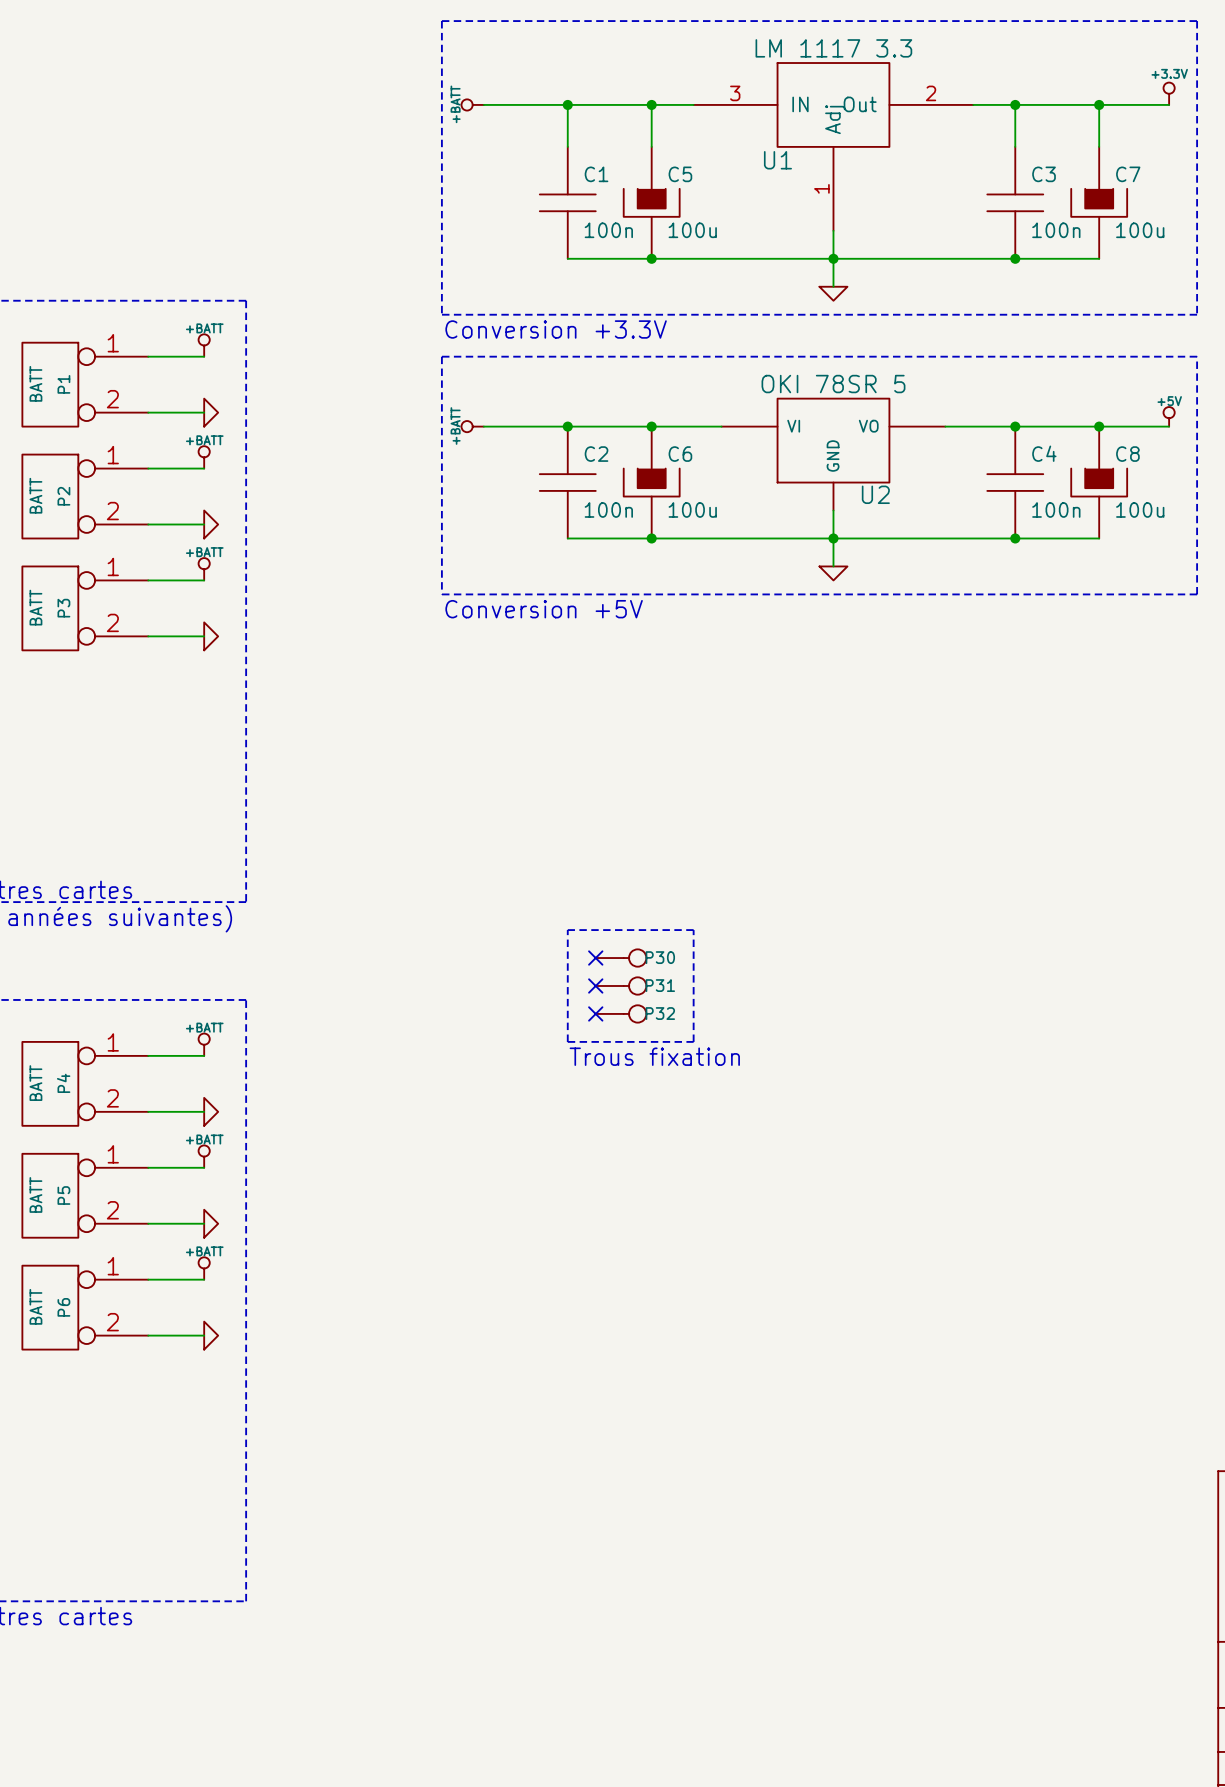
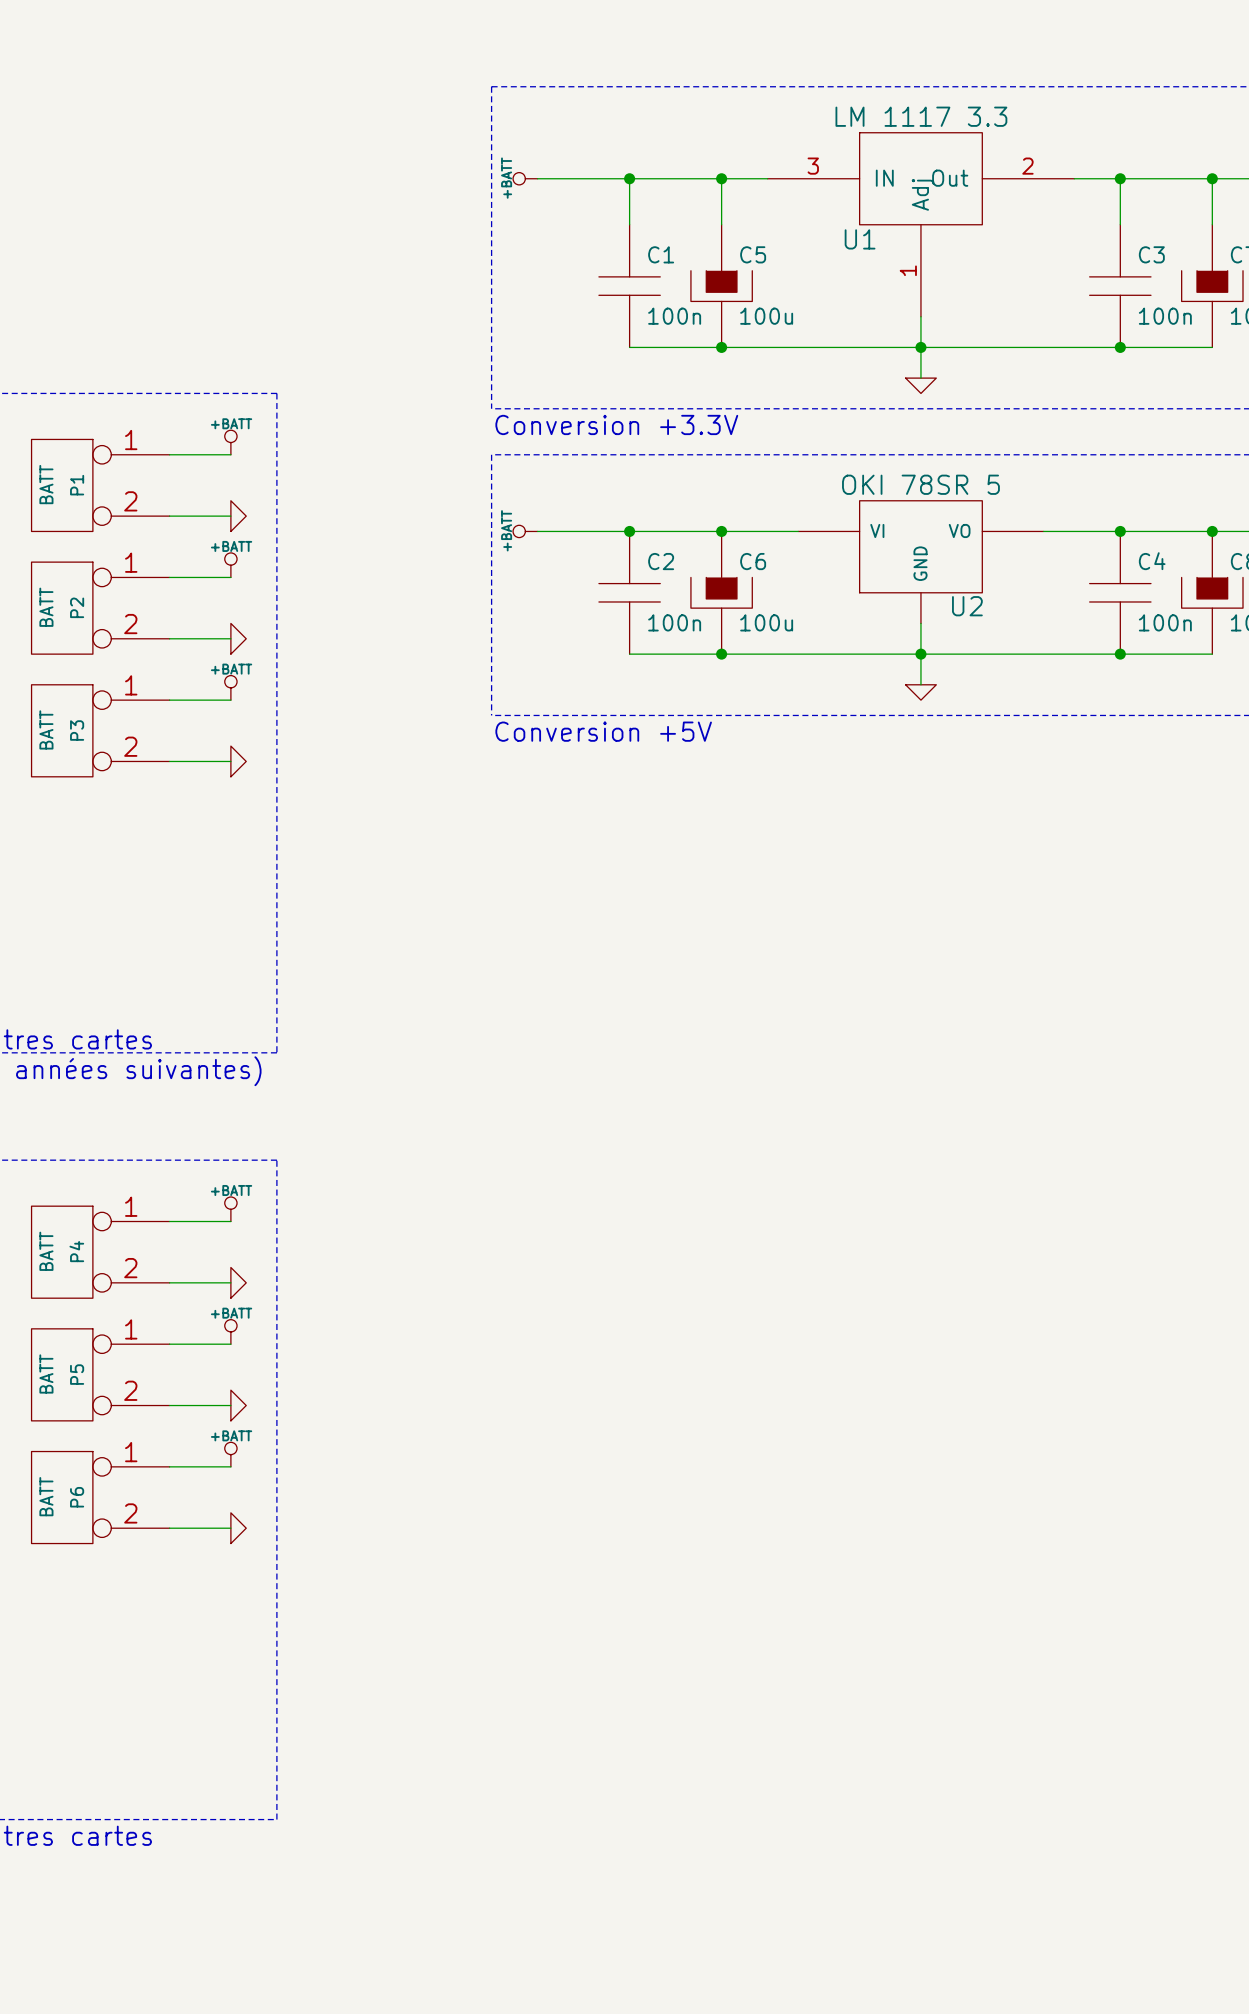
line: (567, 930) (567, 1041) (693, 1041) (693, 930) (567, 930) -> none
no-connect mark: (595, 958) -> none
P30: (621, 958) -> none
no-connect mark: (595, 985) -> none
P31: (621, 985) -> none
no-connect mark: (595, 1013) -> none
P32: (621, 1013) -> none
text: Trous fixation (654, 1056) -> none

